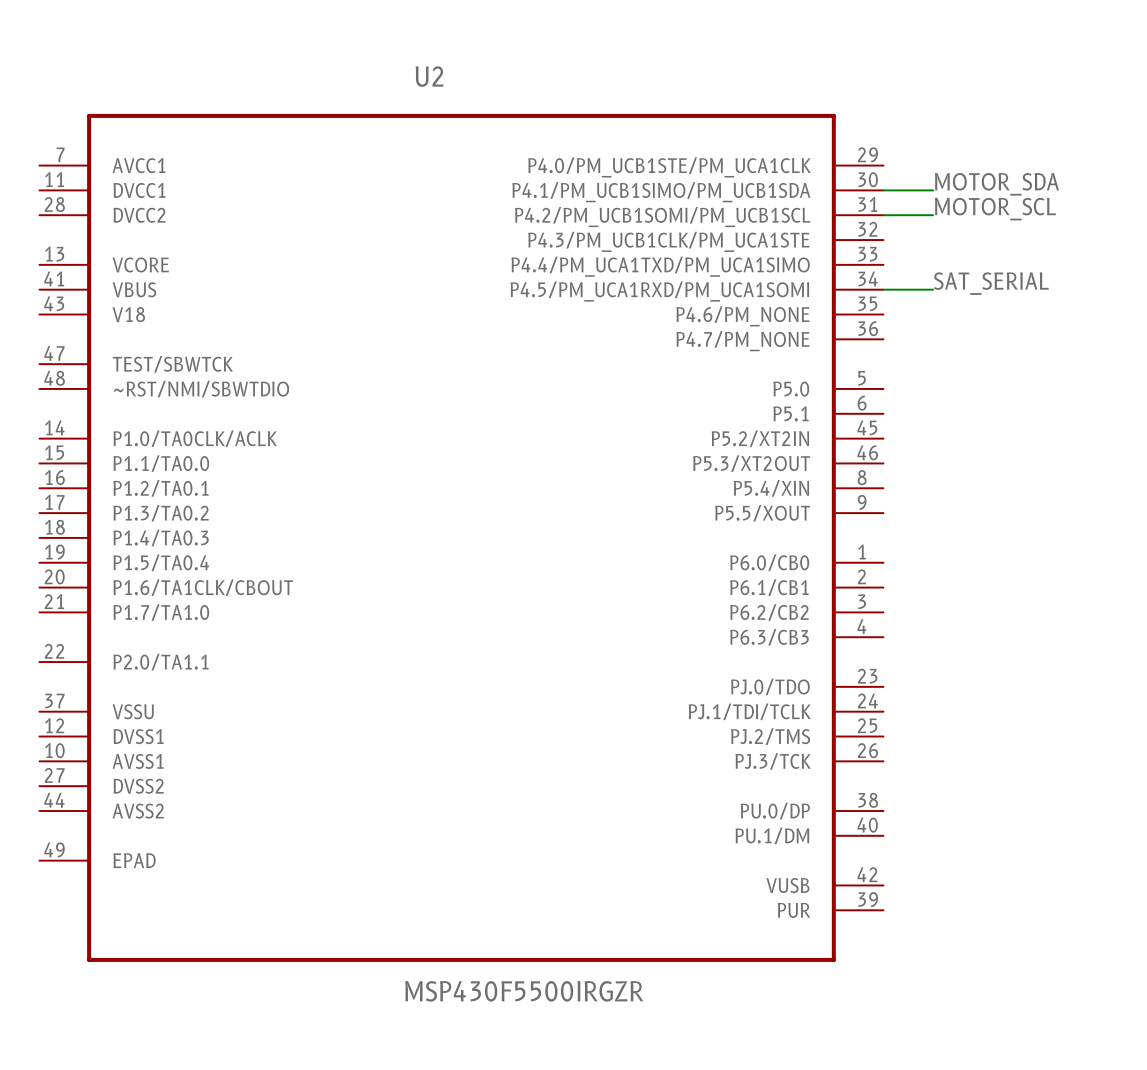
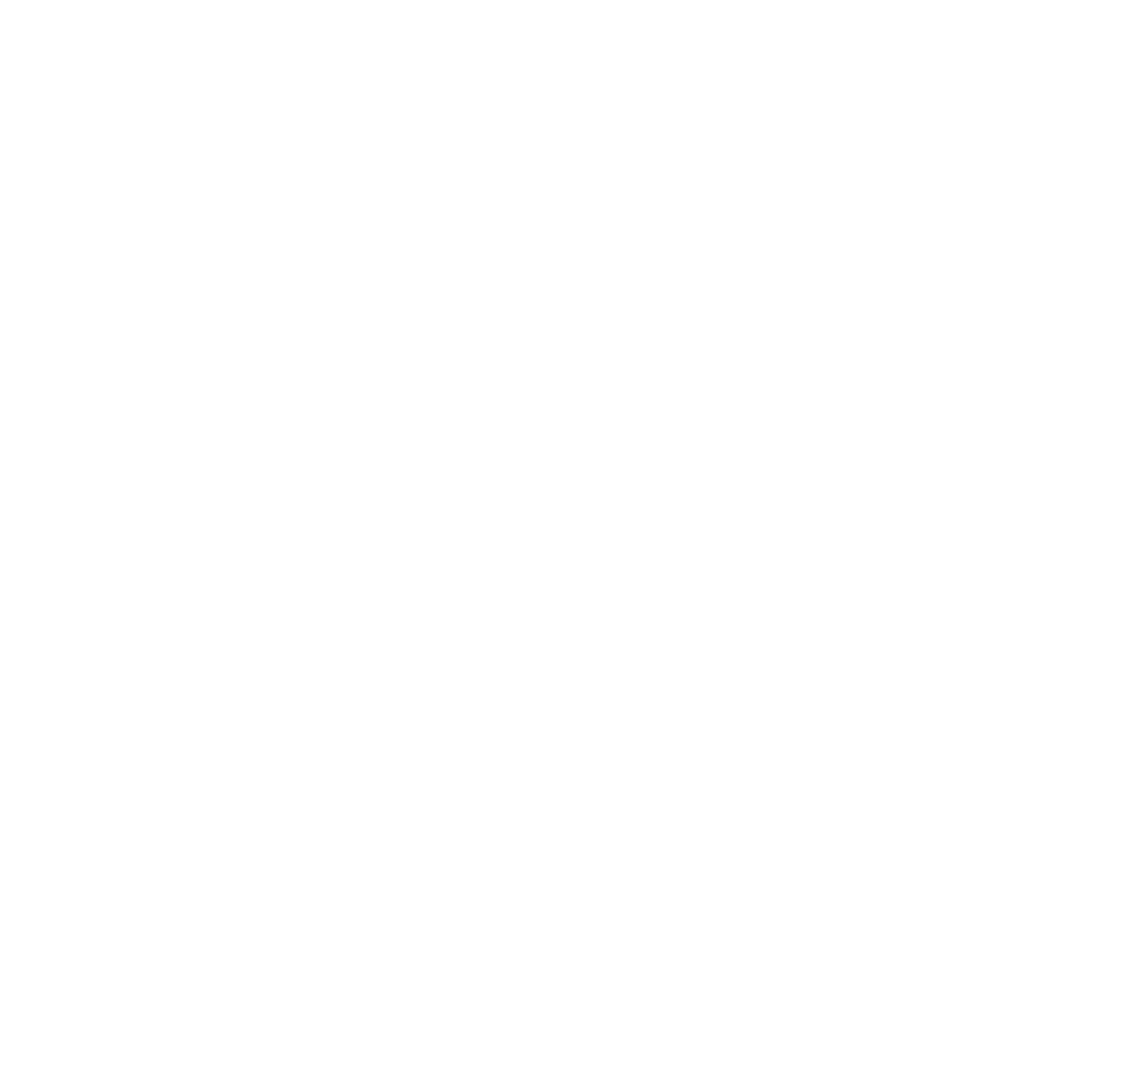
label: MOTOR_SDA (996, 184) -> none
wire: (883, 190) (933, 190) -> none
label: MOTOR_SCL (995, 209) -> none
wire: (883, 215) (933, 215) -> none
label: SAT_SERIAL (991, 283) -> none
wire: (883, 289) (933, 289) -> none
U2: MSP430F5500IRGZR (461, 537) -> none

